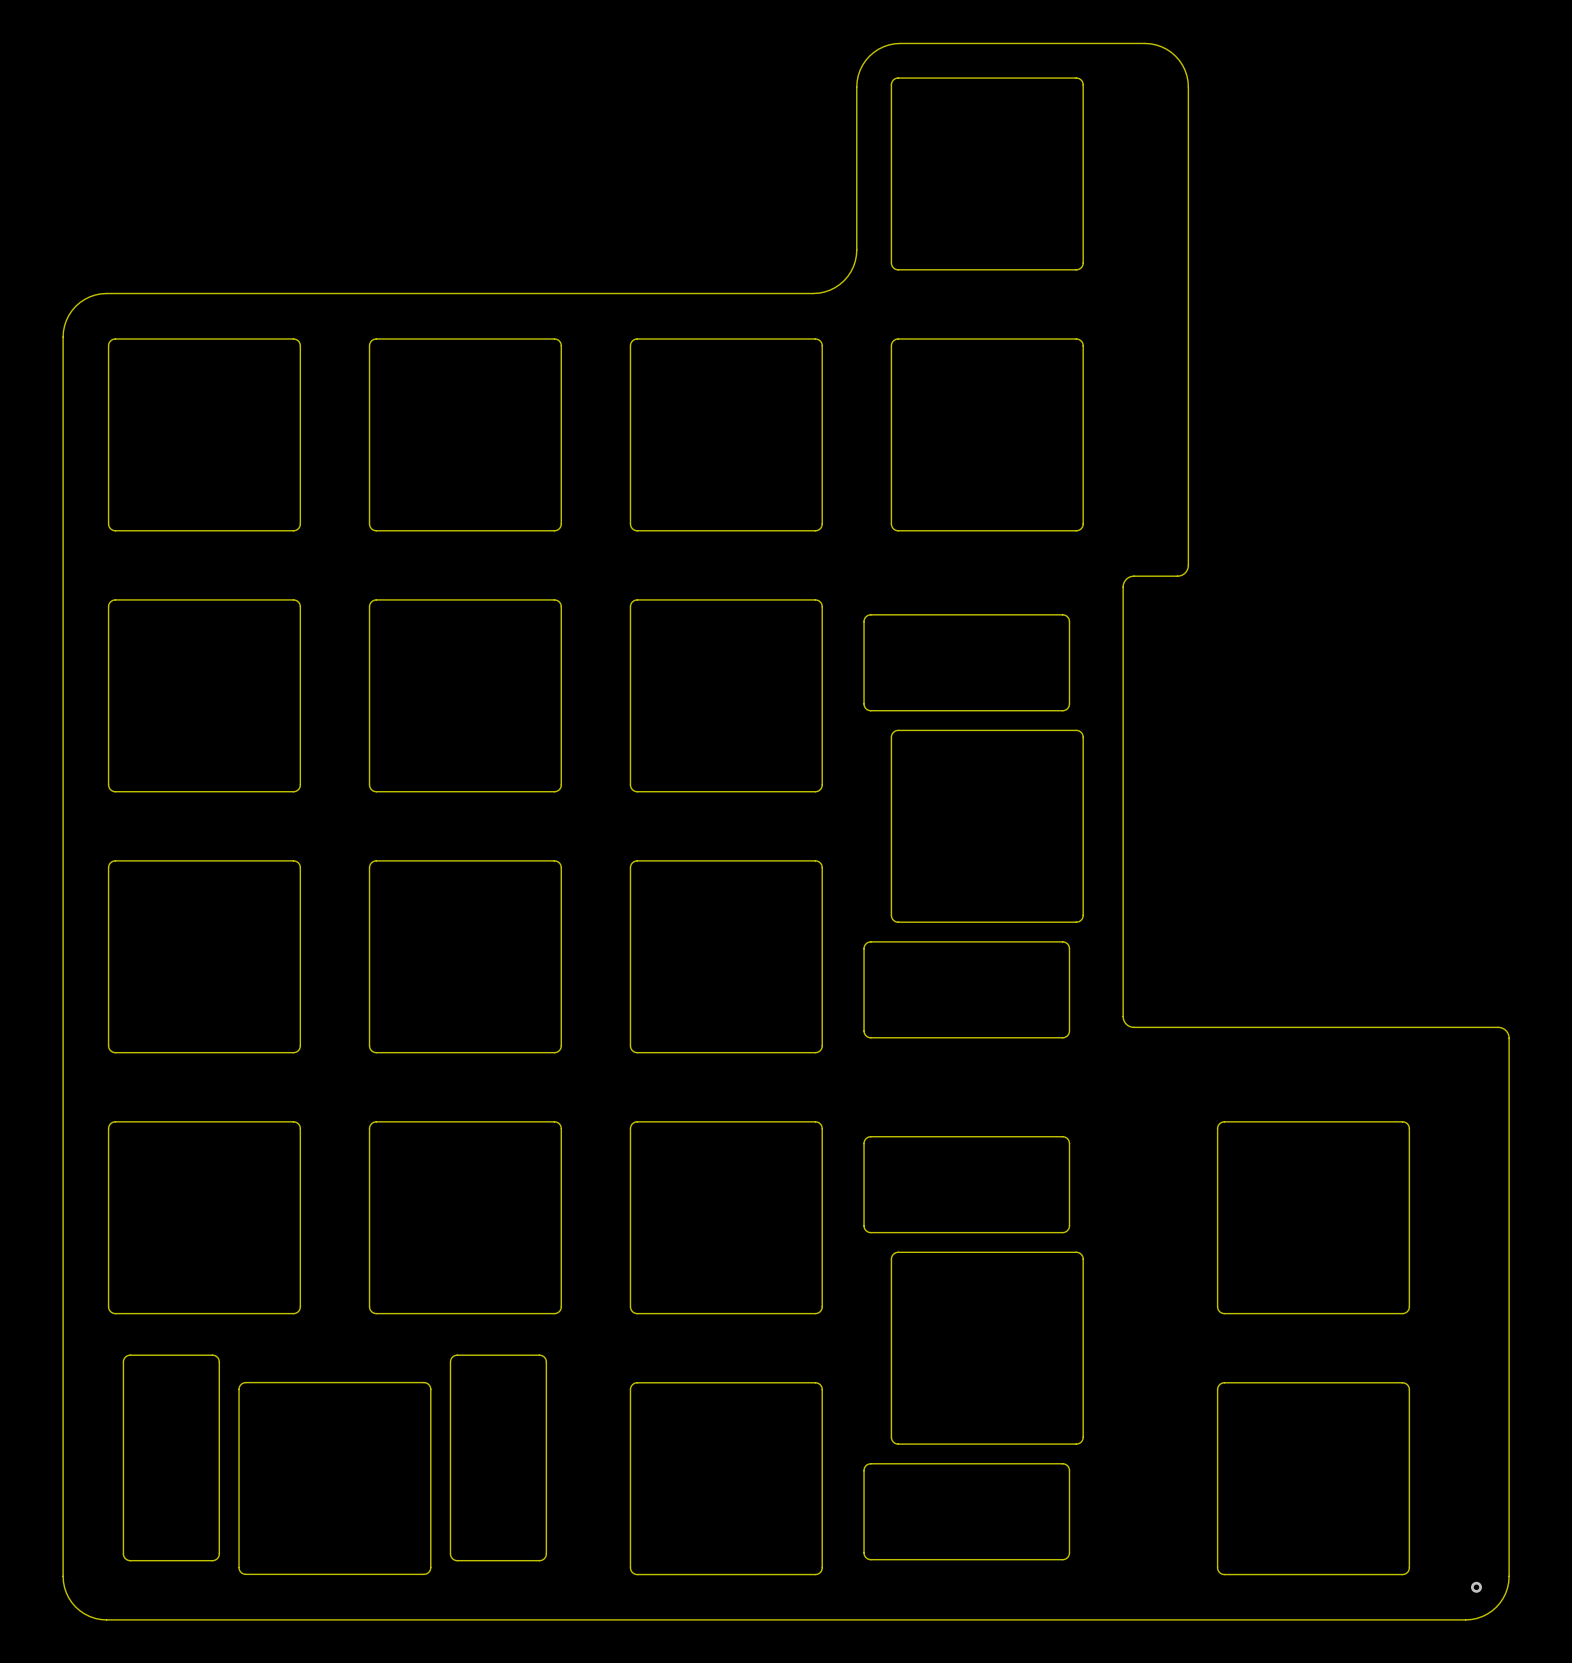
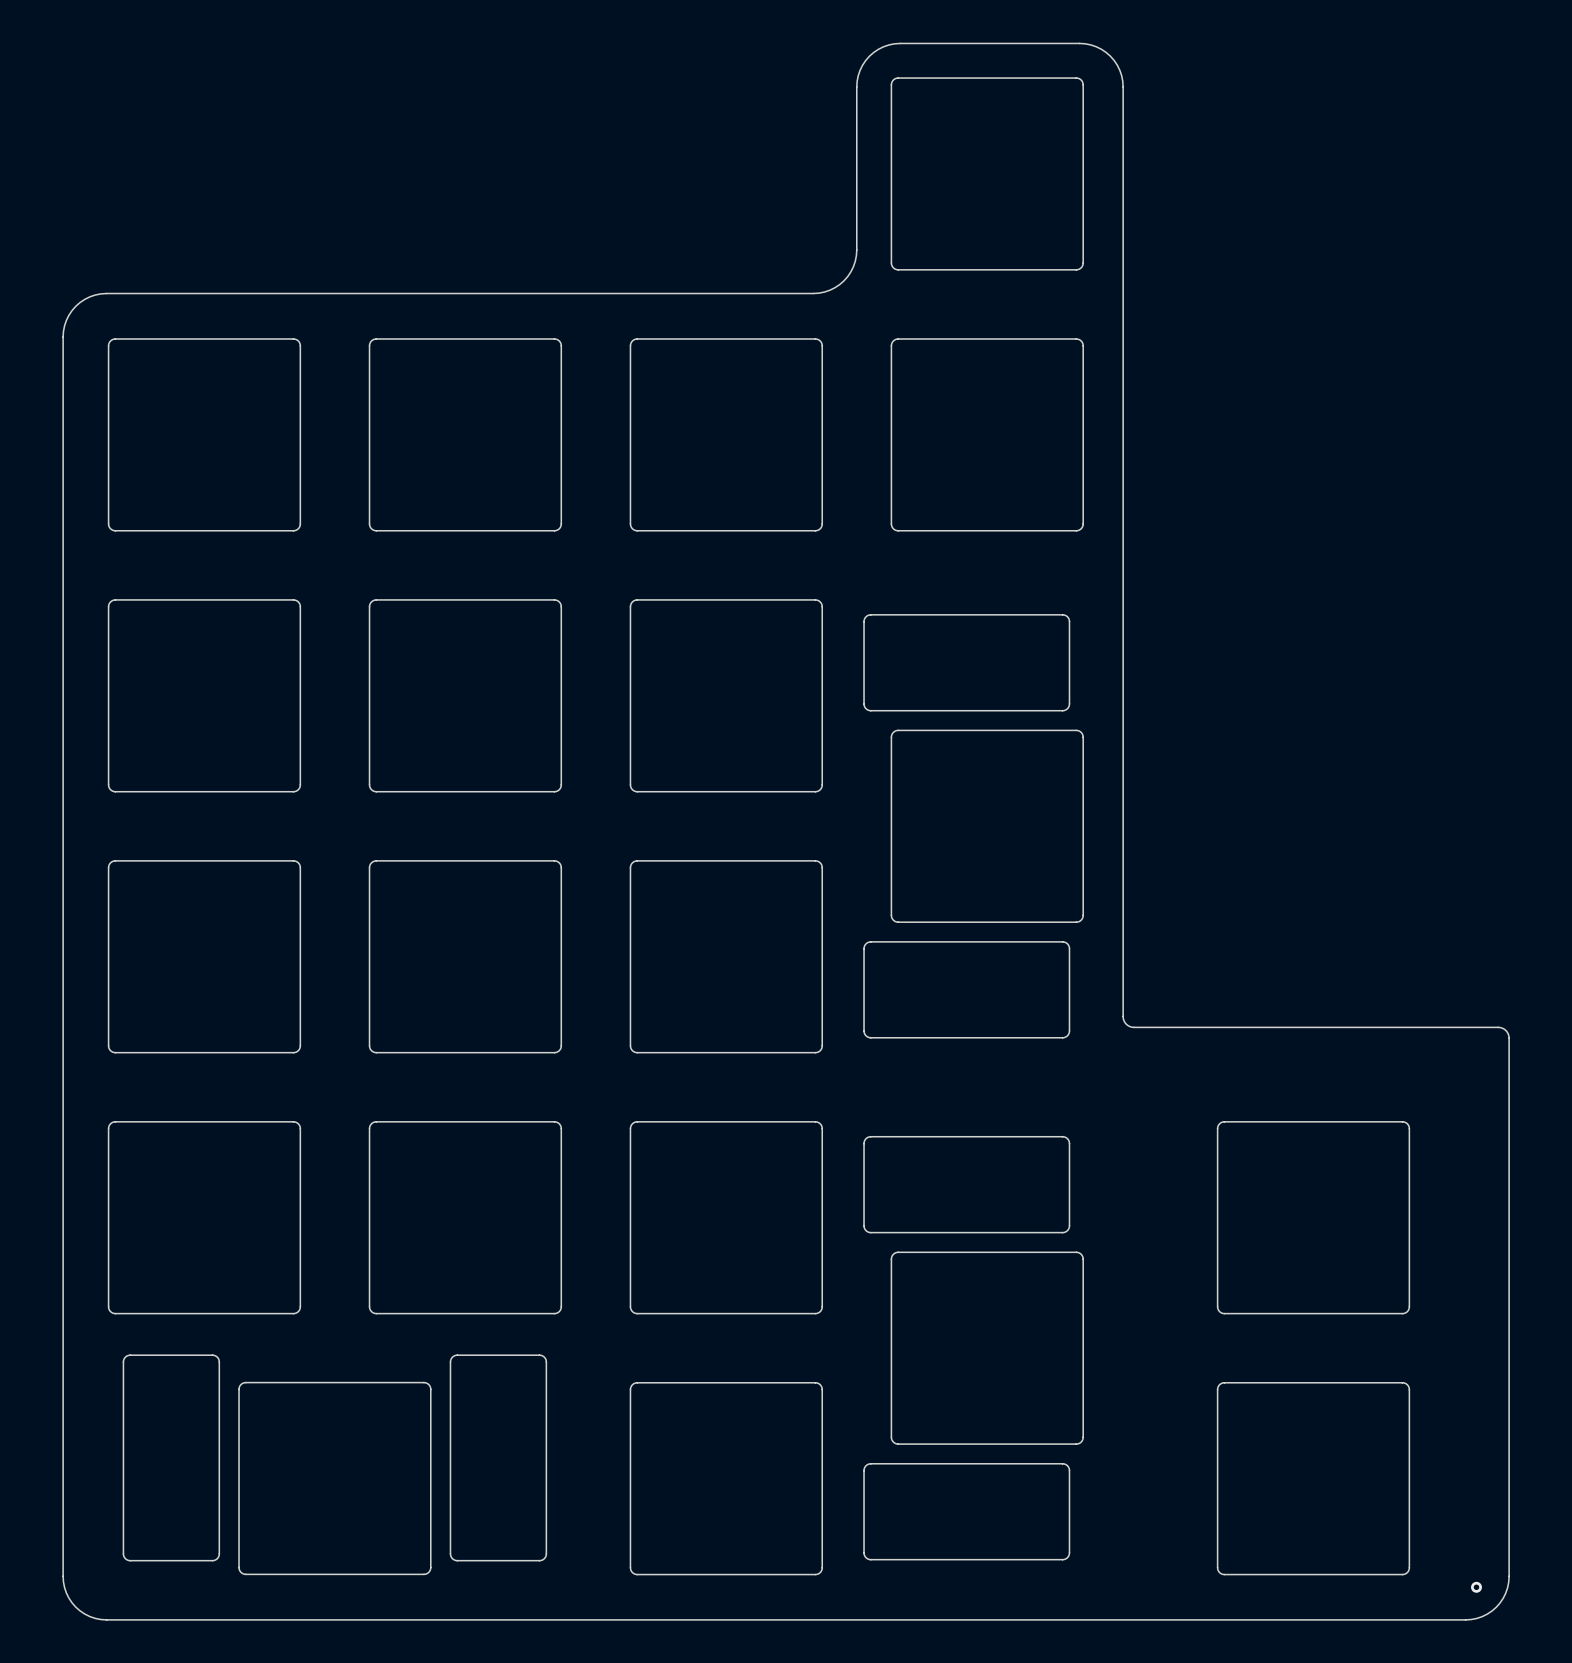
board edge: (1079, 43) (1144, 43) (1161, 46) (1179, 60) (1188, 81) (1188, 566) (1185, 573) (1178, 576) (1131, 576) (1125, 580) (1123, 587) -> (1079, 43) (1090, 44) (1106, 52) (1117, 65) (1122, 81) (1123, 587)

